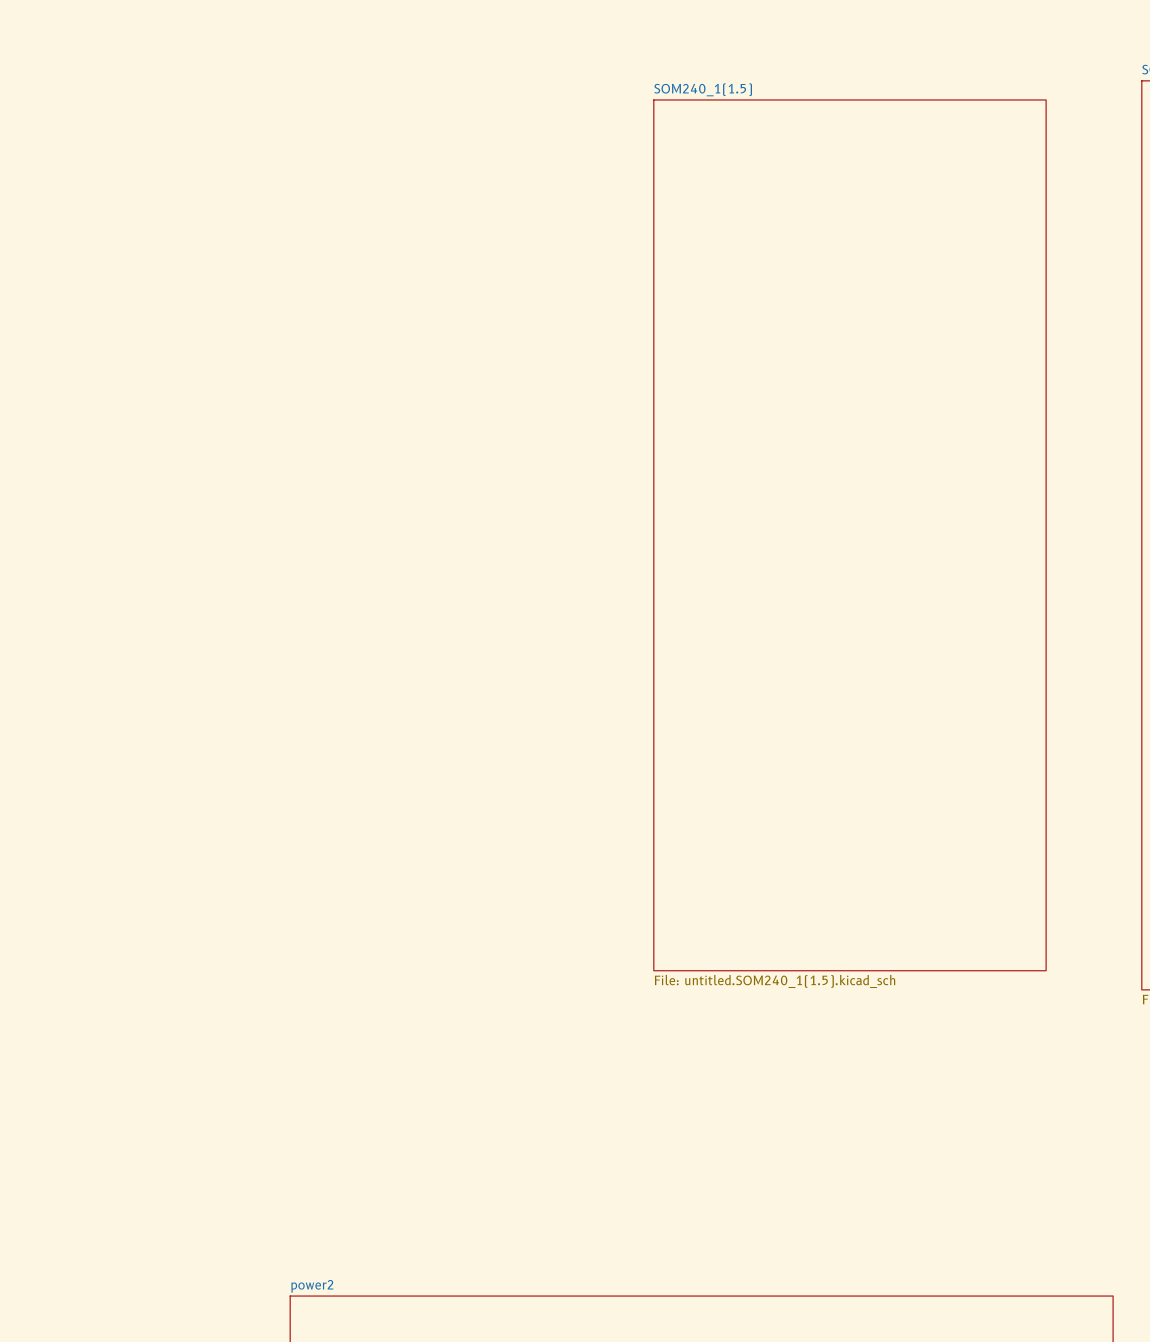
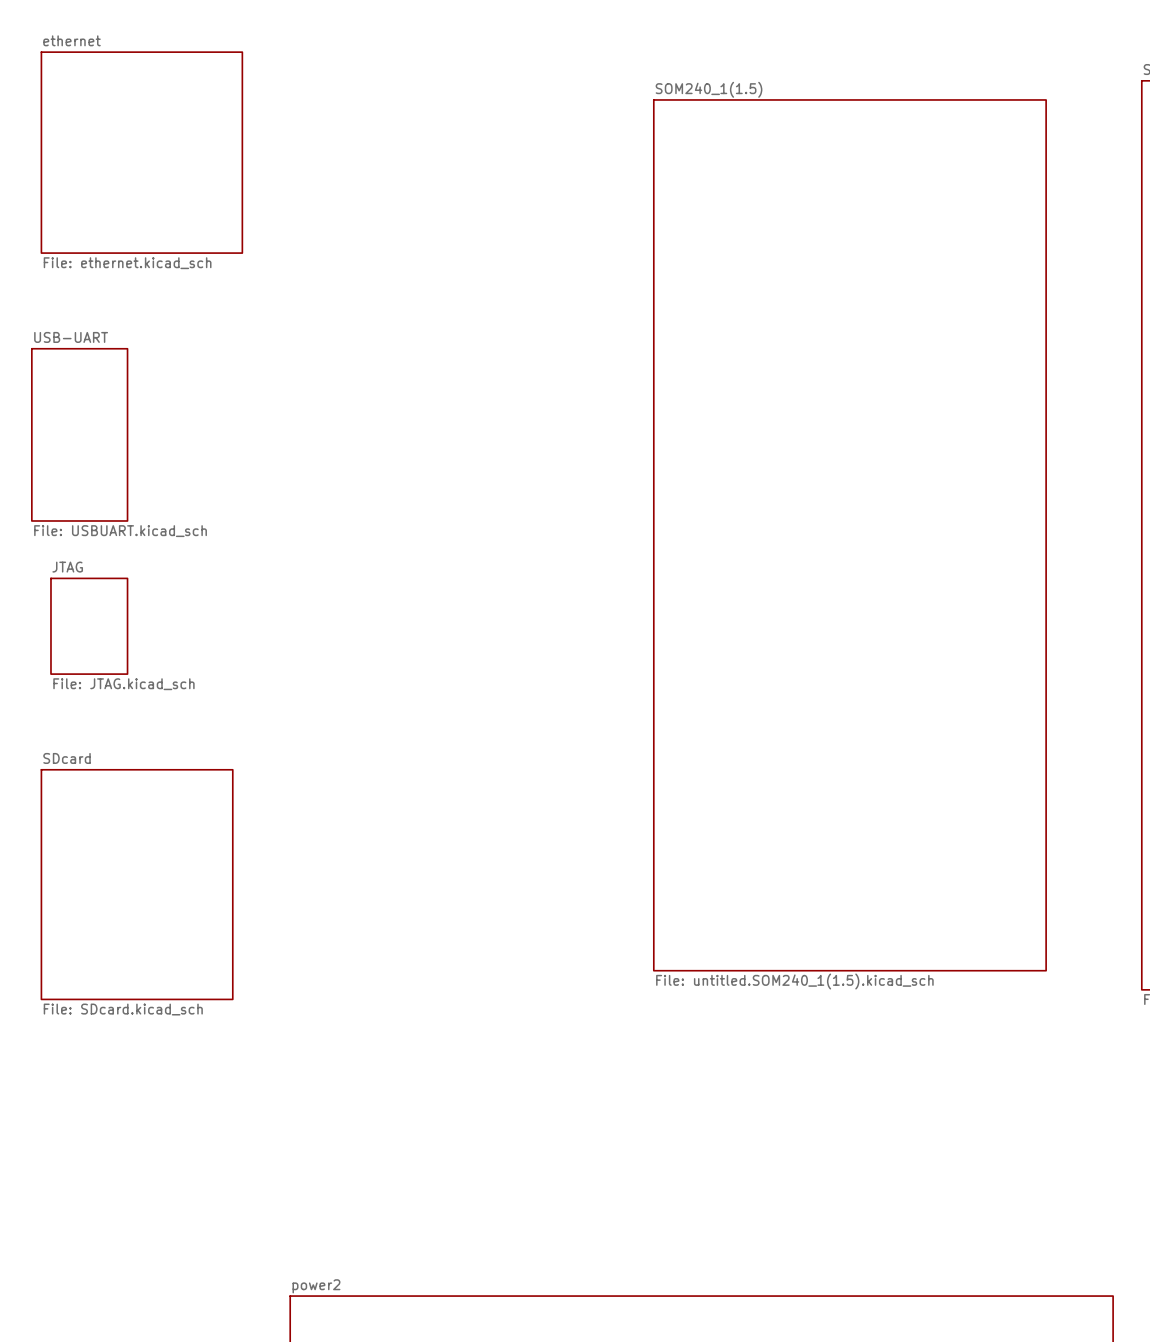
sheet ethernet: none -> File: ethernet.kicad_sch (141, 152)
sheet USB-UART: none -> File: USBUART.kicad_sch (79, 434)
sheet JTAG: none -> File: JTAG.kicad_sch (89, 626)
sheet SDcard: none -> File: SDcard.kicad_sch (137, 884)

